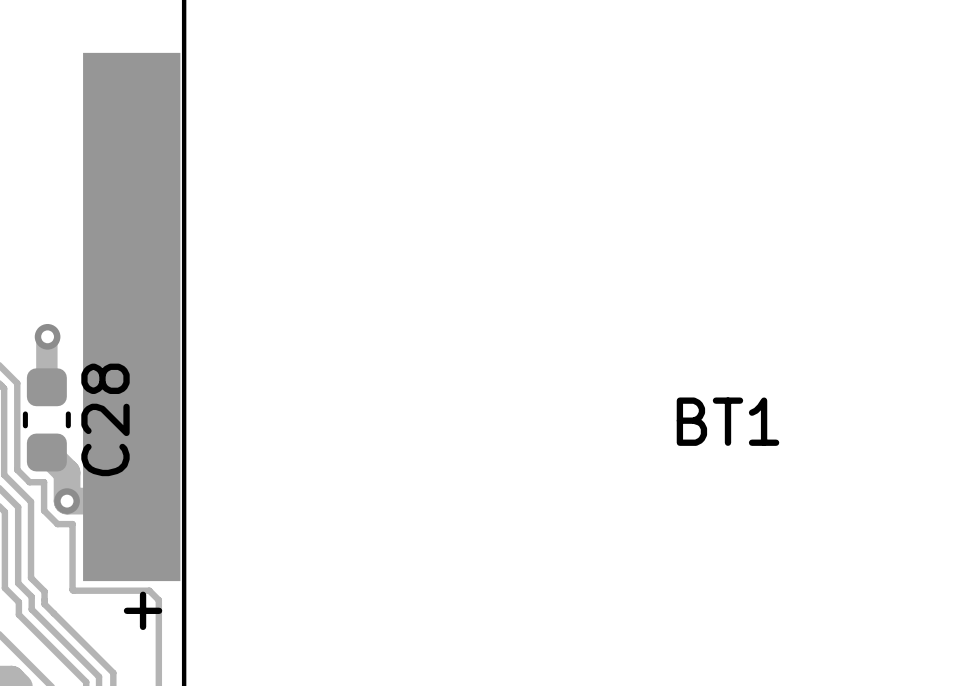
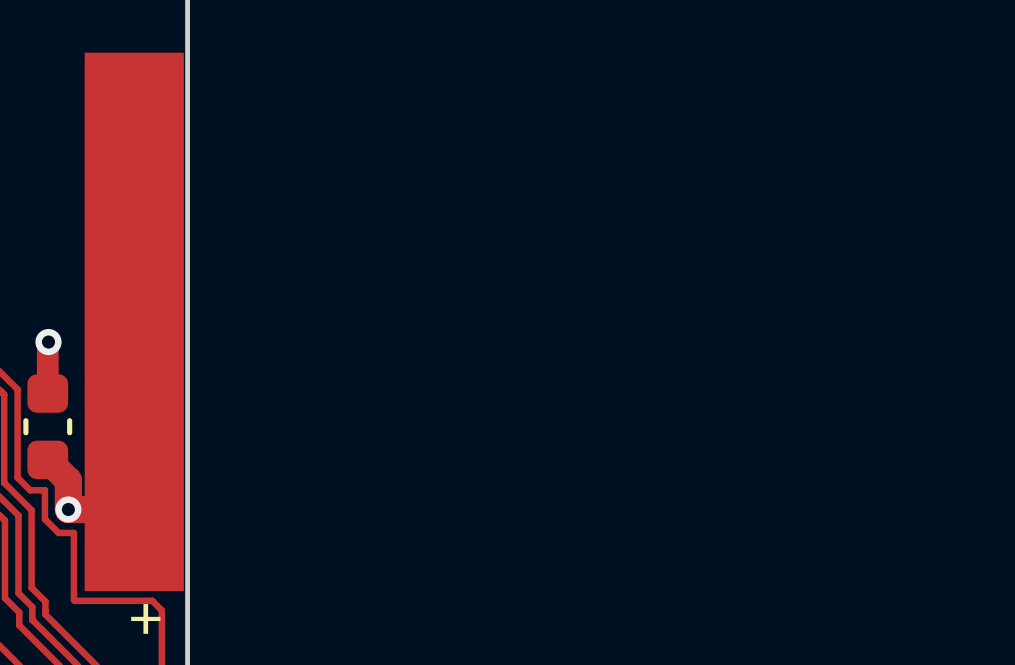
C28 name: C28 (105, 419) -> none
BT1 name: BT1 (728, 421) -> none

